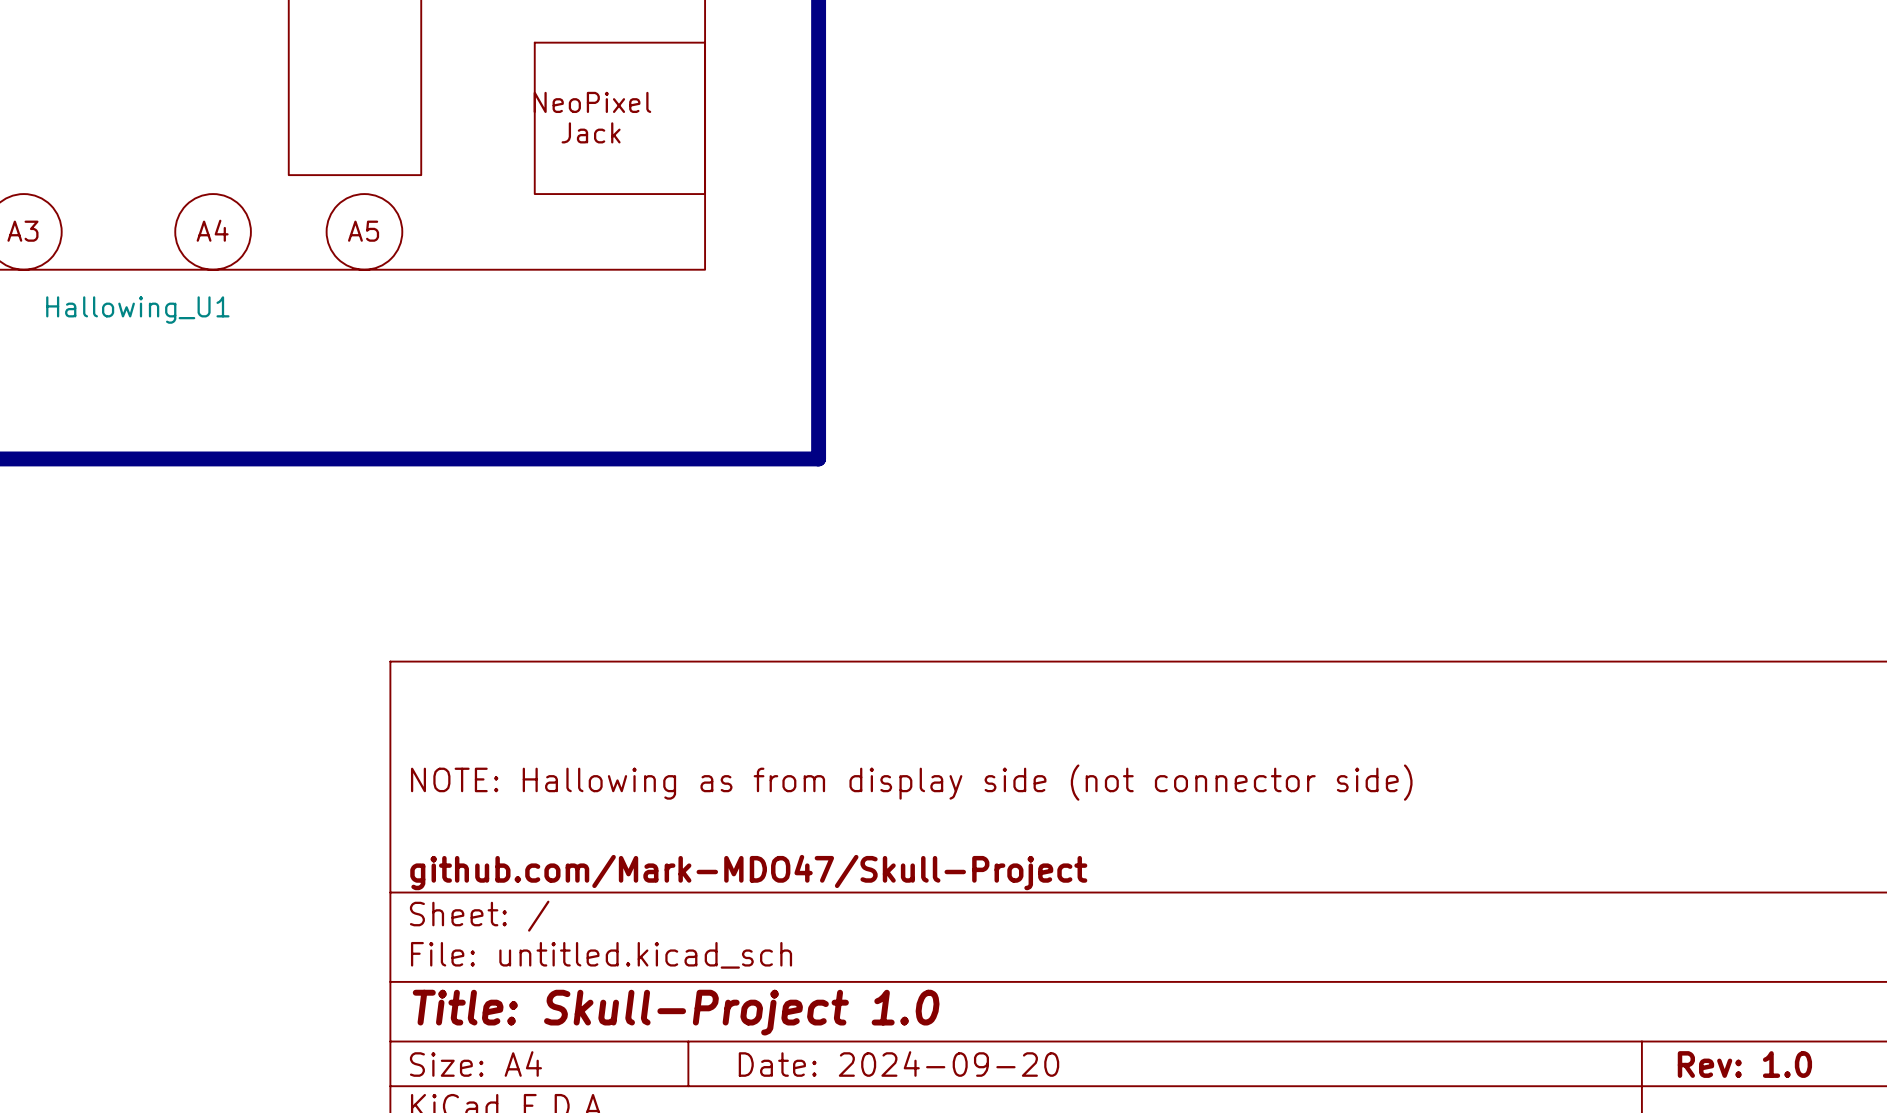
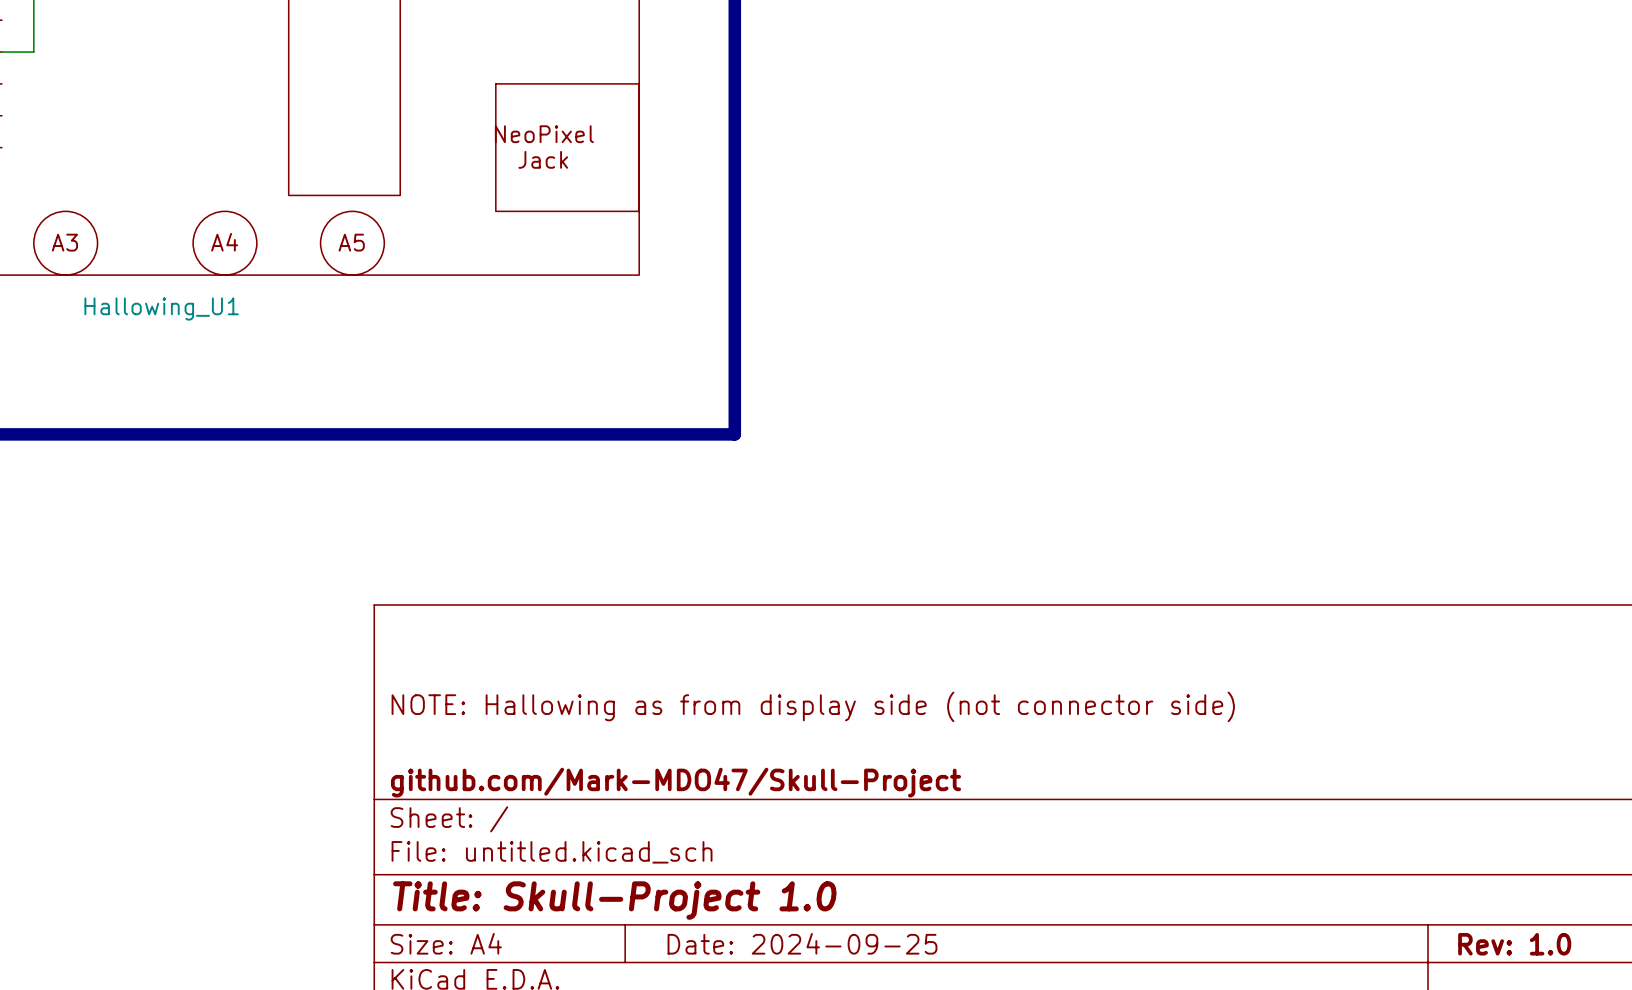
title block: Date: 2024-09-20 (898, 1063) -> Date: 2024-09-25 (802, 943)

